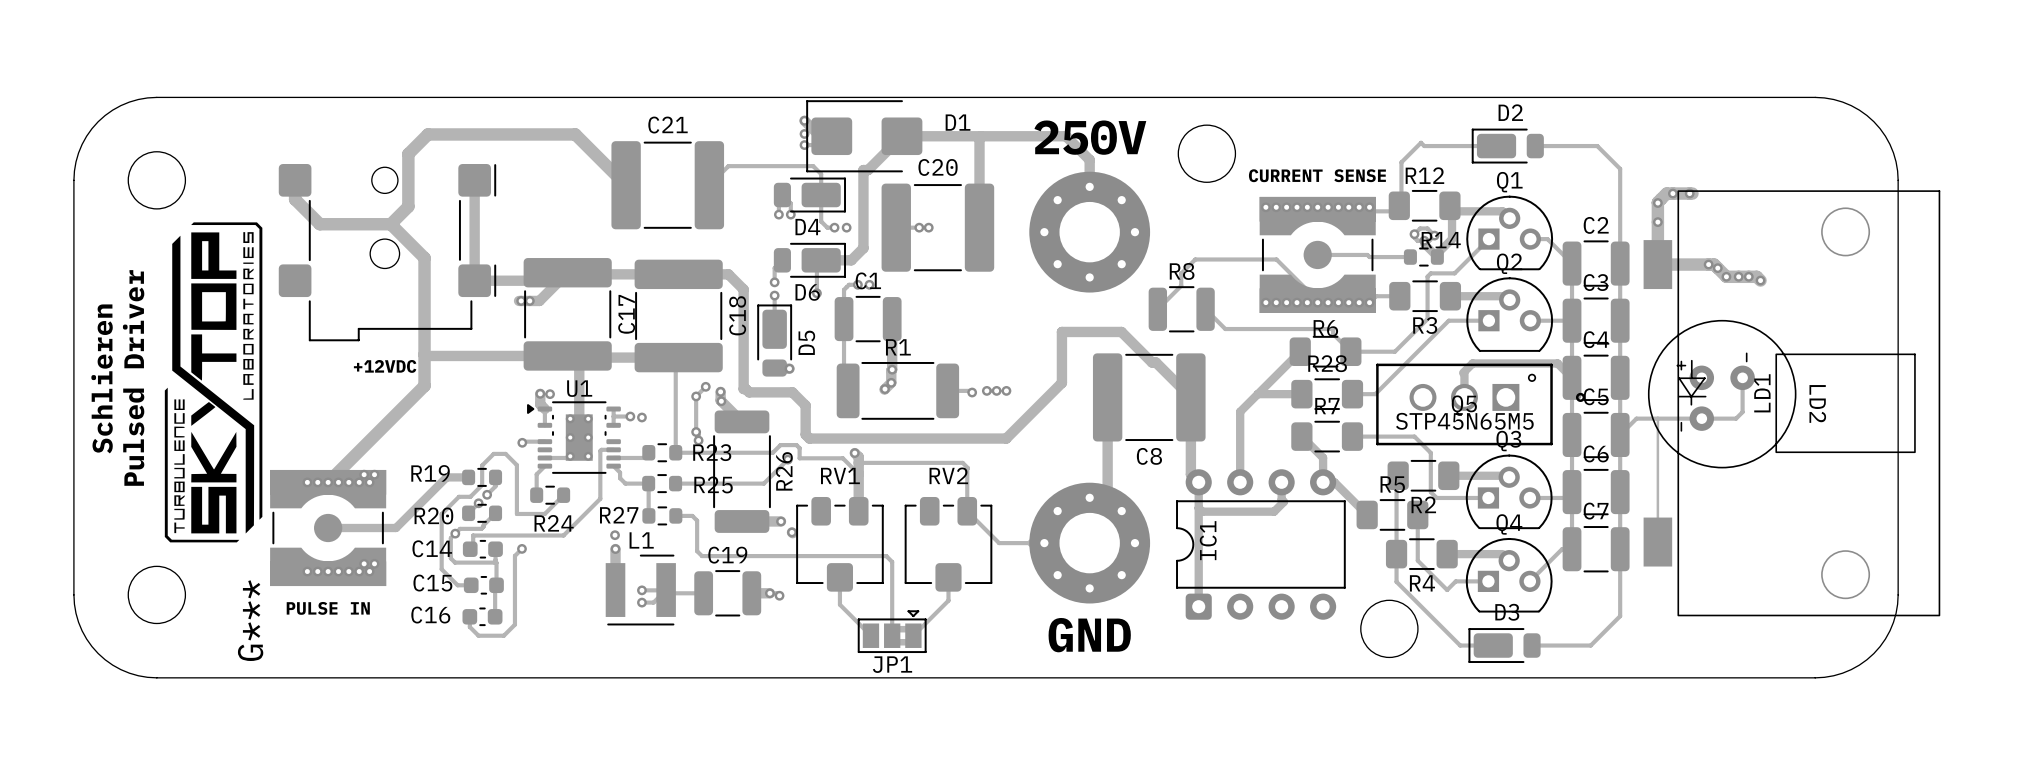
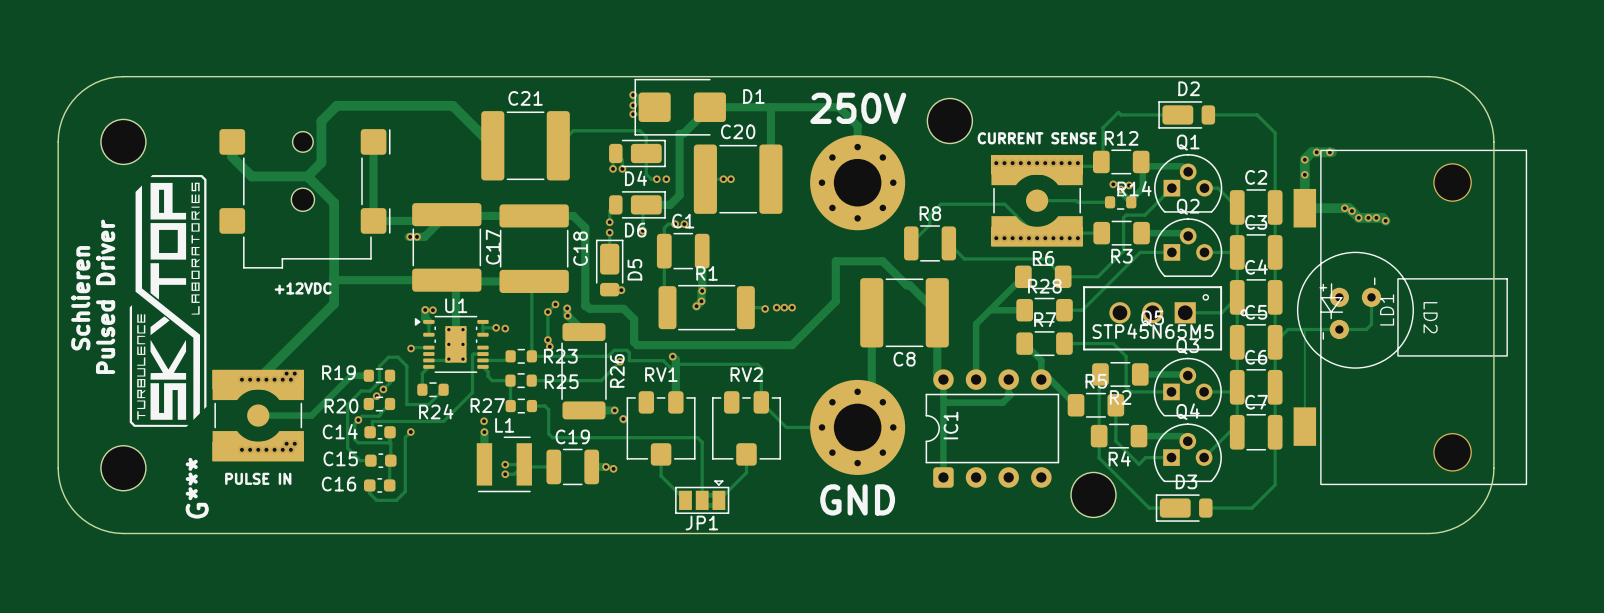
track: (1420, 228) (1427, 228) (1434, 235) (1429, 240) (1417, 241) (1414, 237) (1414, 234) (1420, 228) -> none
track: (1572, 377) (1557, 363) (1472, 363) (1463, 372) (1464, 397) -> (1237, 297) (1221, 312) (1185, 312)

